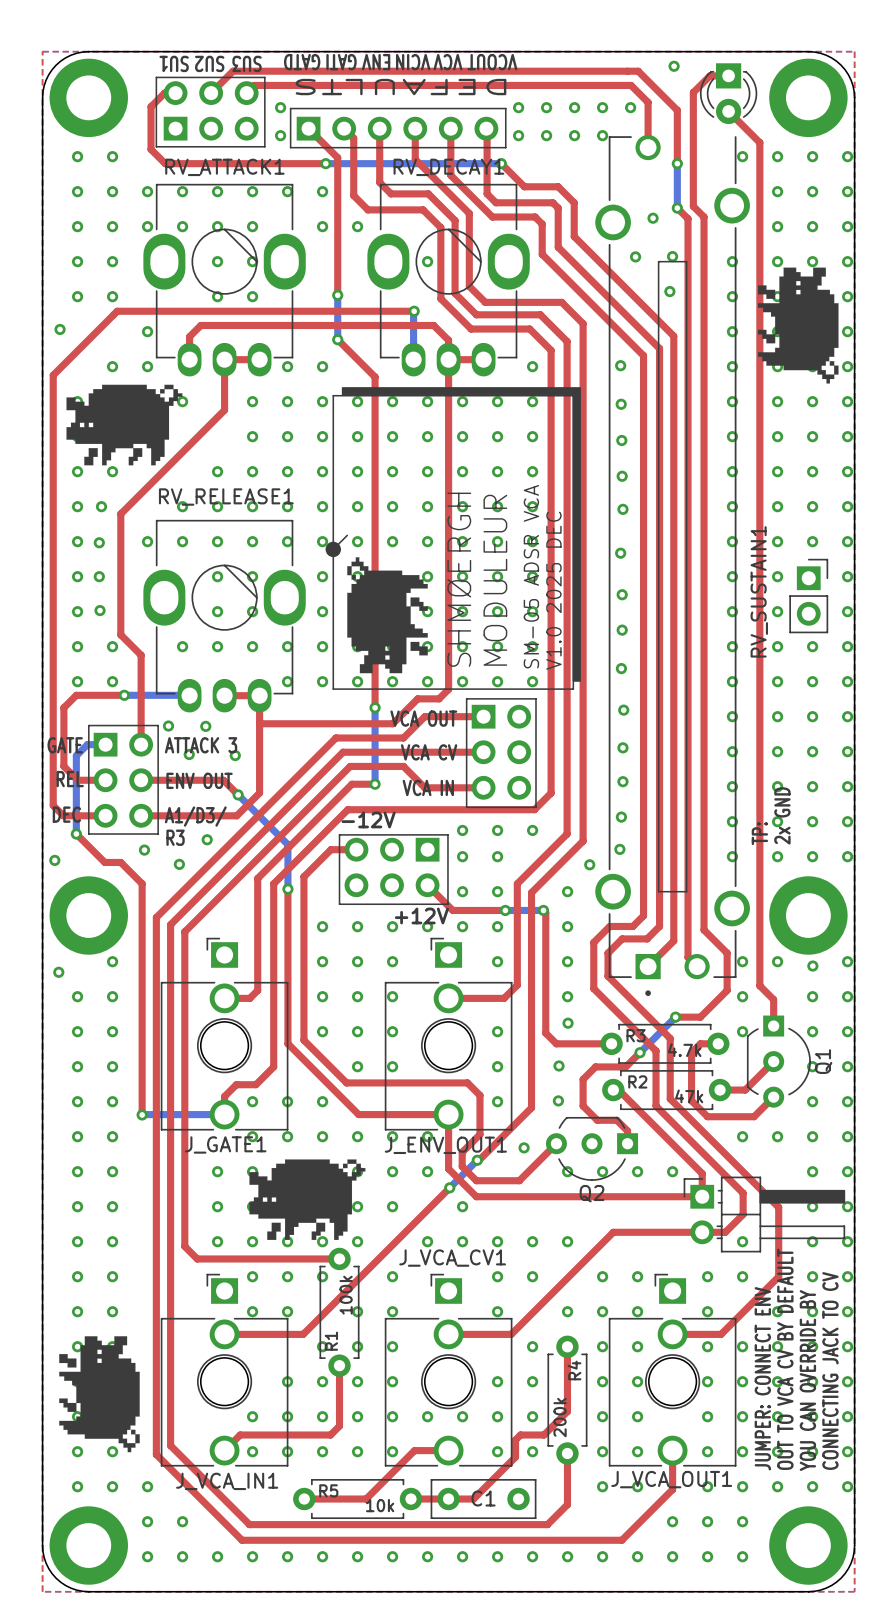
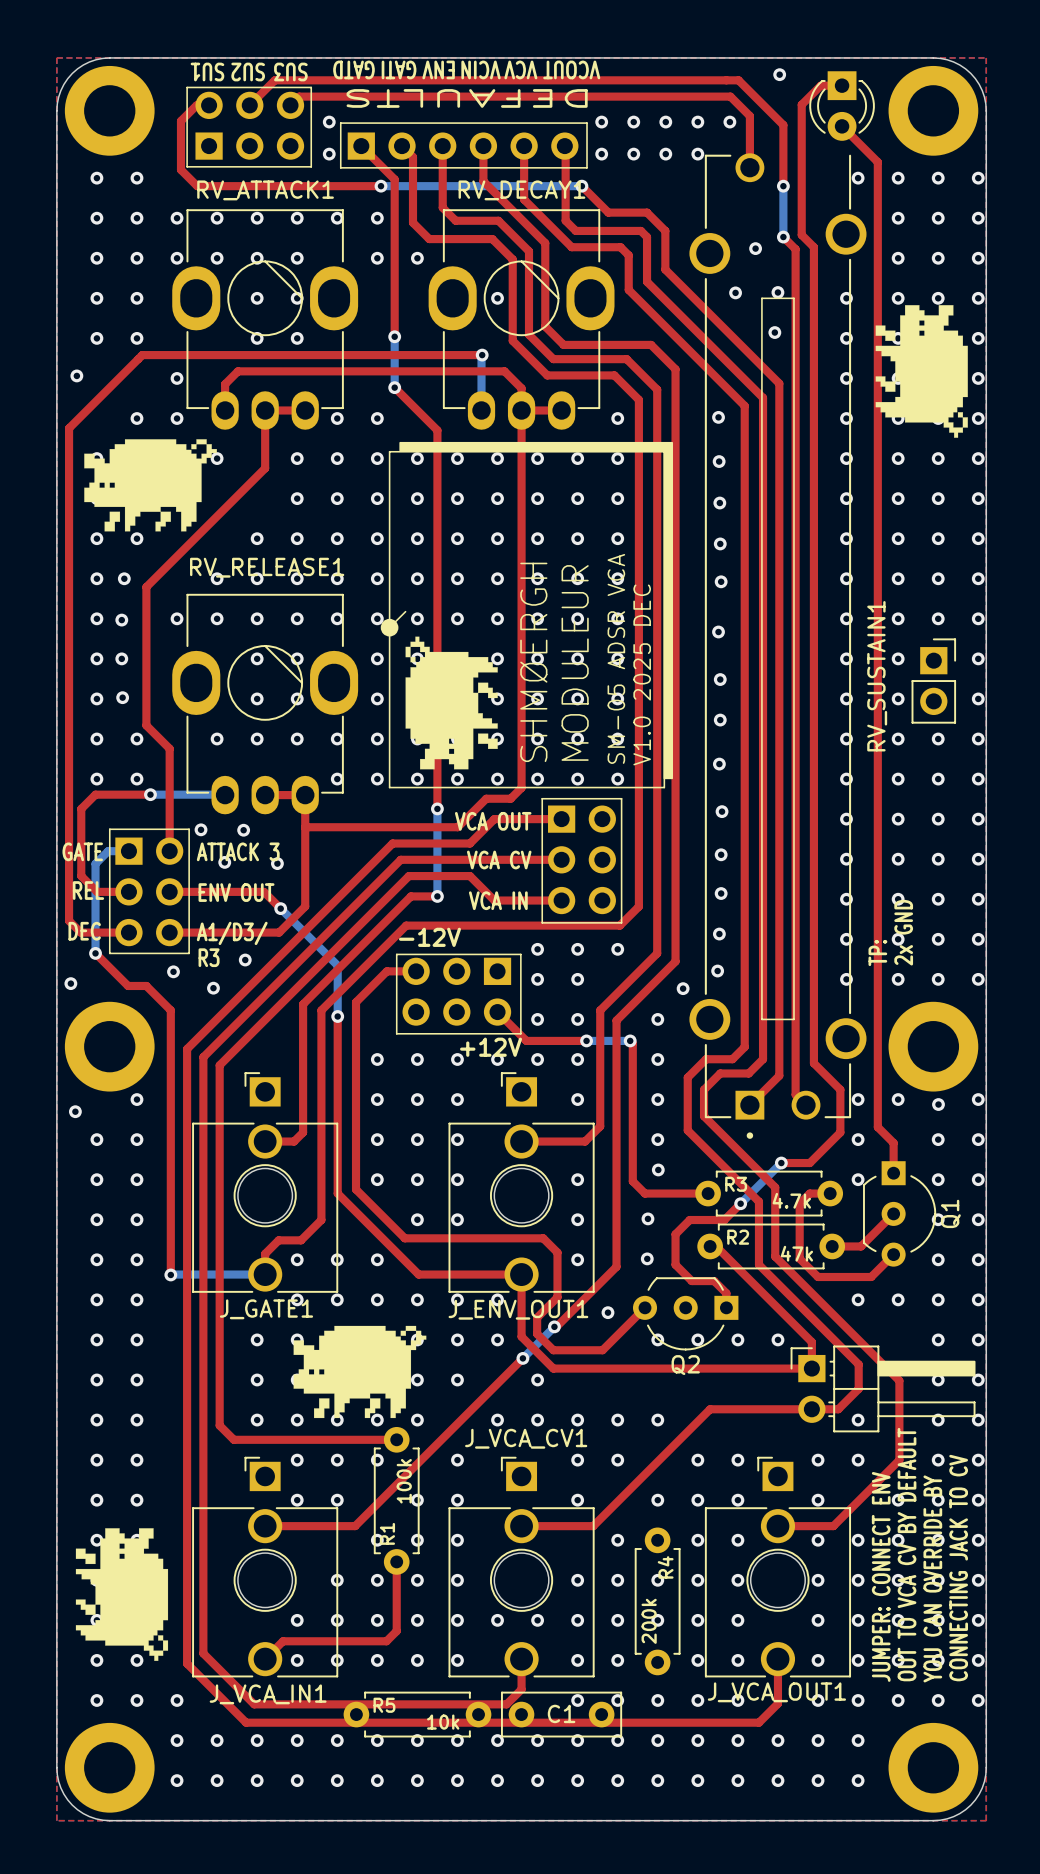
top track: (567, 1346) (567, 1411) (543, 1435) (520, 1435) (515, 1439) (515, 1457) (473, 1499) (410, 1499) -> none
via: none -> (657, 1580)
via: none -> (657, 1620)
top track: (448, 1450) (414, 1450) (366, 1499) (304, 1499) -> (521, 1659) (521, 1689) (506, 1704) (254, 1704)
top track: (567, 1453) (567, 1504) (547, 1524) (249, 1524) (215, 1490) -> none
via: none -> (577, 1700)
via: none -> (617, 1700)
via: none -> (657, 1700)
top track: (207, 1506) (242, 1540) (621, 1540) (656, 1506) -> (246, 1722) (758, 1722)
via: none -> (257, 1740)
via: none -> (297, 1740)
via: none -> (337, 1740)
via: none -> (377, 1740)
via: none -> (417, 1740)
via: none -> (457, 1740)
via: none -> (497, 1740)
via: none -> (537, 1740)
via: none -> (577, 1740)
via: none -> (617, 1740)
via: none -> (657, 1740)
via: none -> (697, 1740)
via: none -> (737, 1740)

